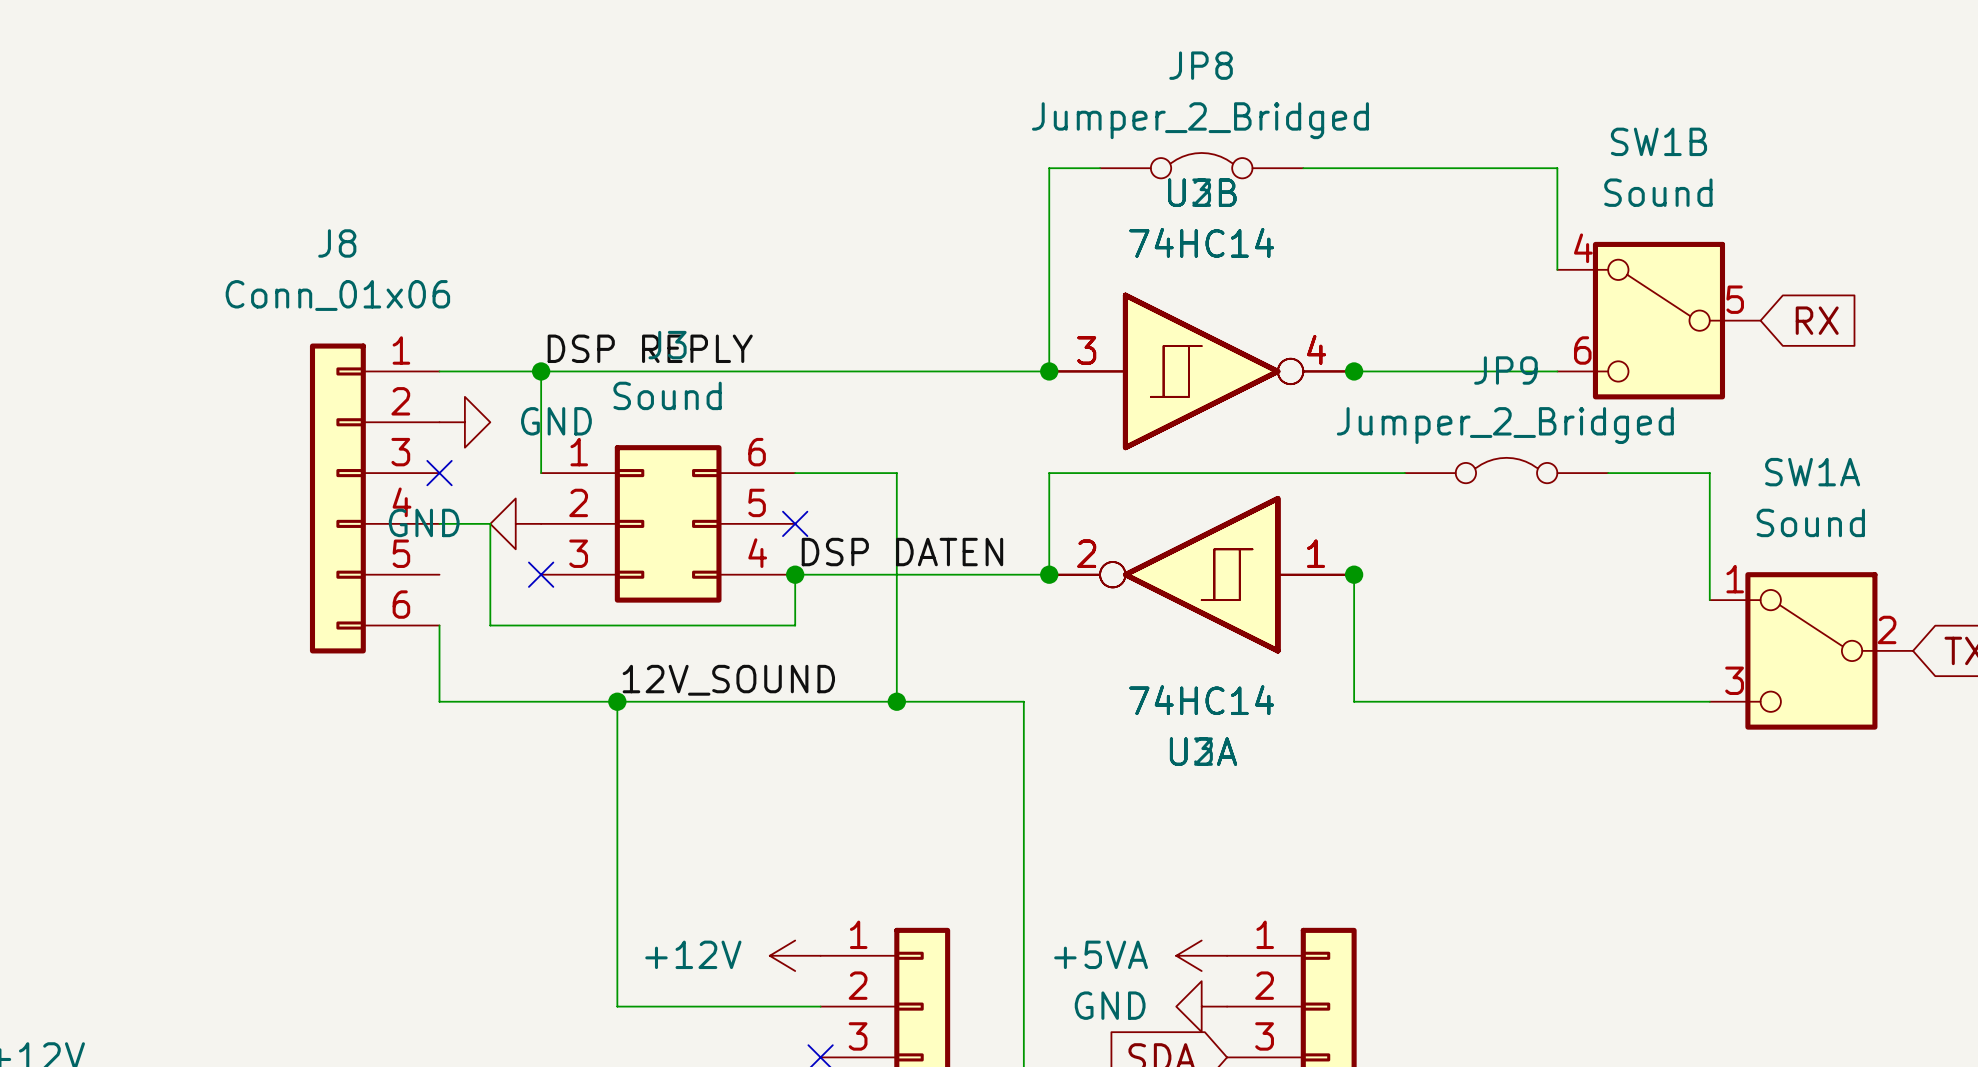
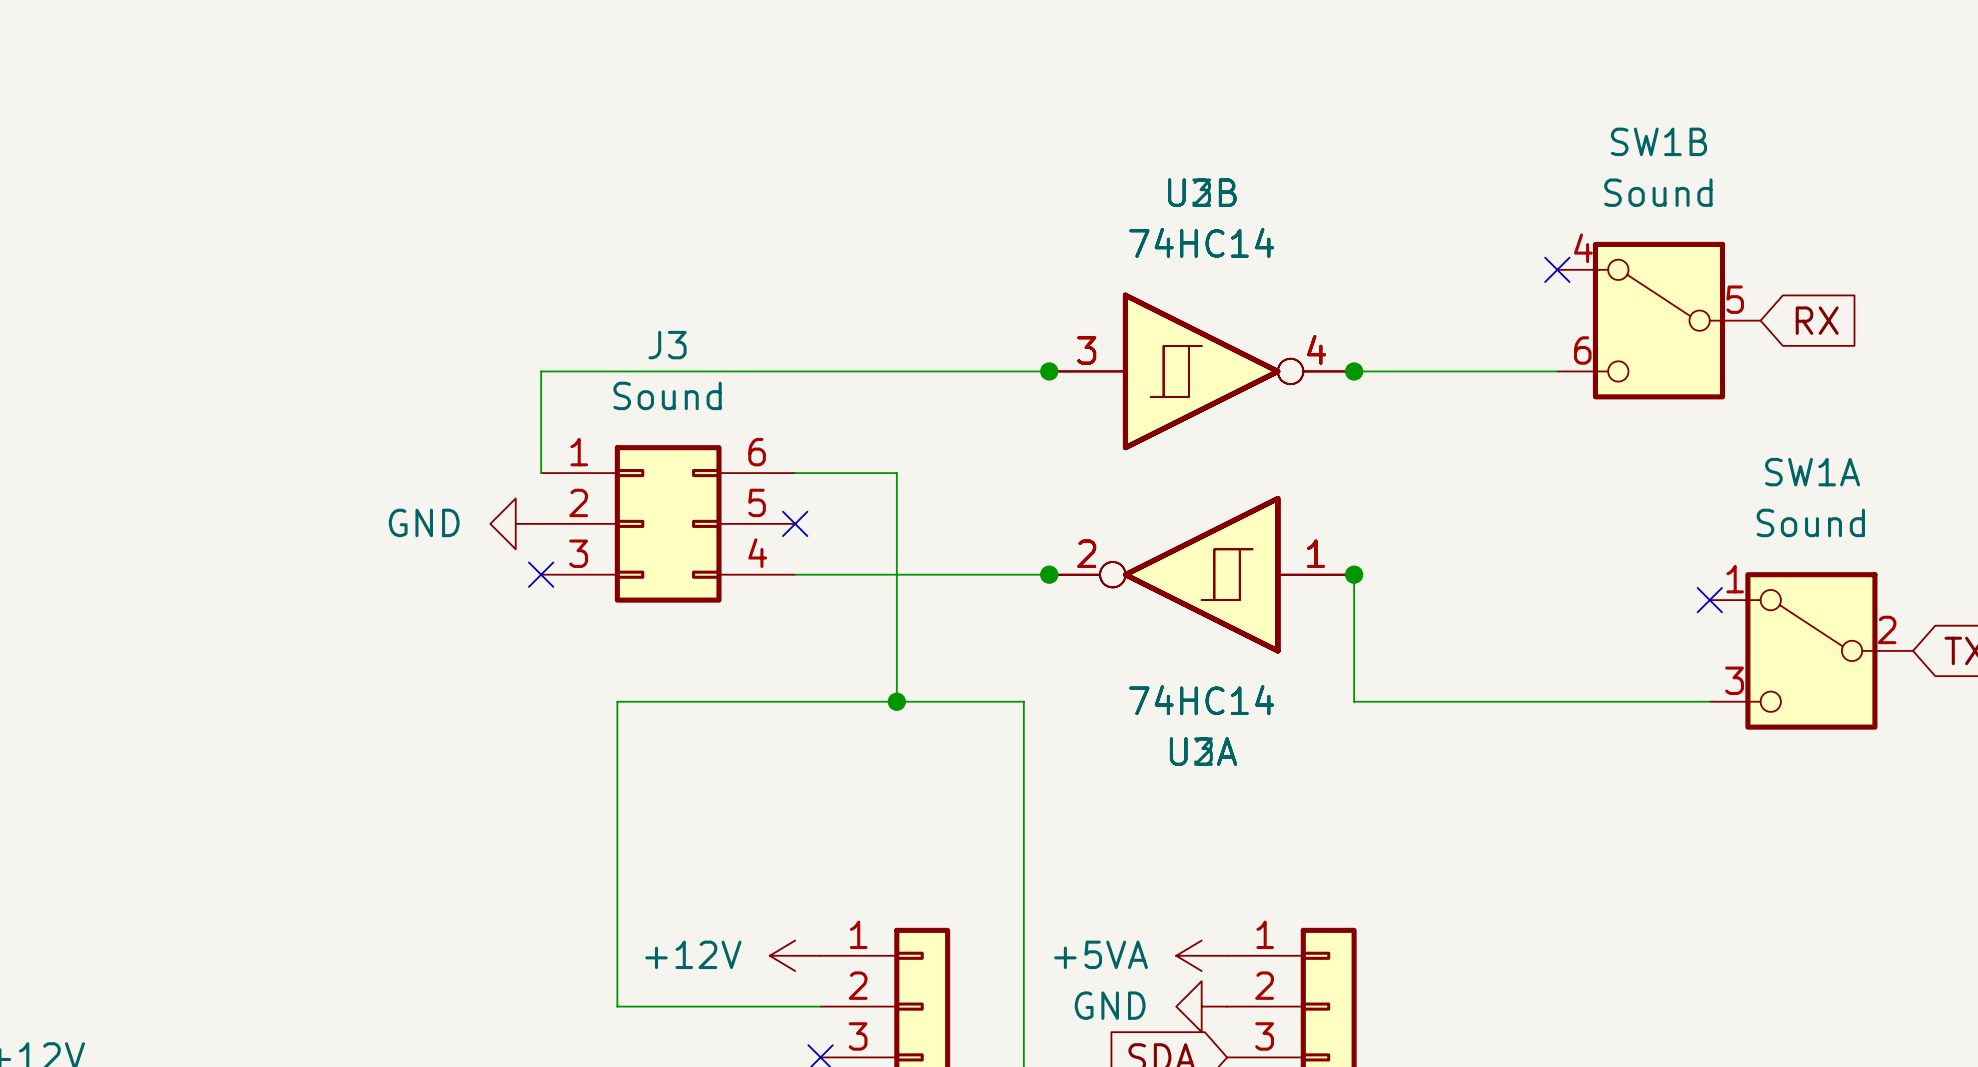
JP8: Jumper_2_Bridged (1201, 165) -> none
wire: (1100, 168) (1049, 168) (1049, 371) -> none
wire: (1303, 168) (1557, 168) (1557, 269) -> none
no-connect mark: none -> (1557, 269)
label: DSP REPLY (650, 348) -> none
wire: (439, 371) (541, 371) -> none
junction: (541, 371) -> none
power symbol: GND (464, 422) -> none
JP9: Jumper_2_Bridged (1506, 470) -> none
no-connect mark: (439, 473) -> none
wire: (1404, 473) (1049, 473) (1049, 574) -> none
wire: (1608, 473) (1709, 473) (1709, 600) -> none
J8: Conn_01x06 (374, 498) -> none
wire: (439, 523) (490, 523) (490, 625) (795, 625) (795, 574) -> none
label: DSP DATEN (902, 552) -> none
junction: (795, 574) -> none
no-connect mark: none -> (1709, 600)
wire: (439, 625) (439, 701) (617, 701) -> none
label: 12V_SOUND (728, 680) -> none
junction: (617, 701) -> none

